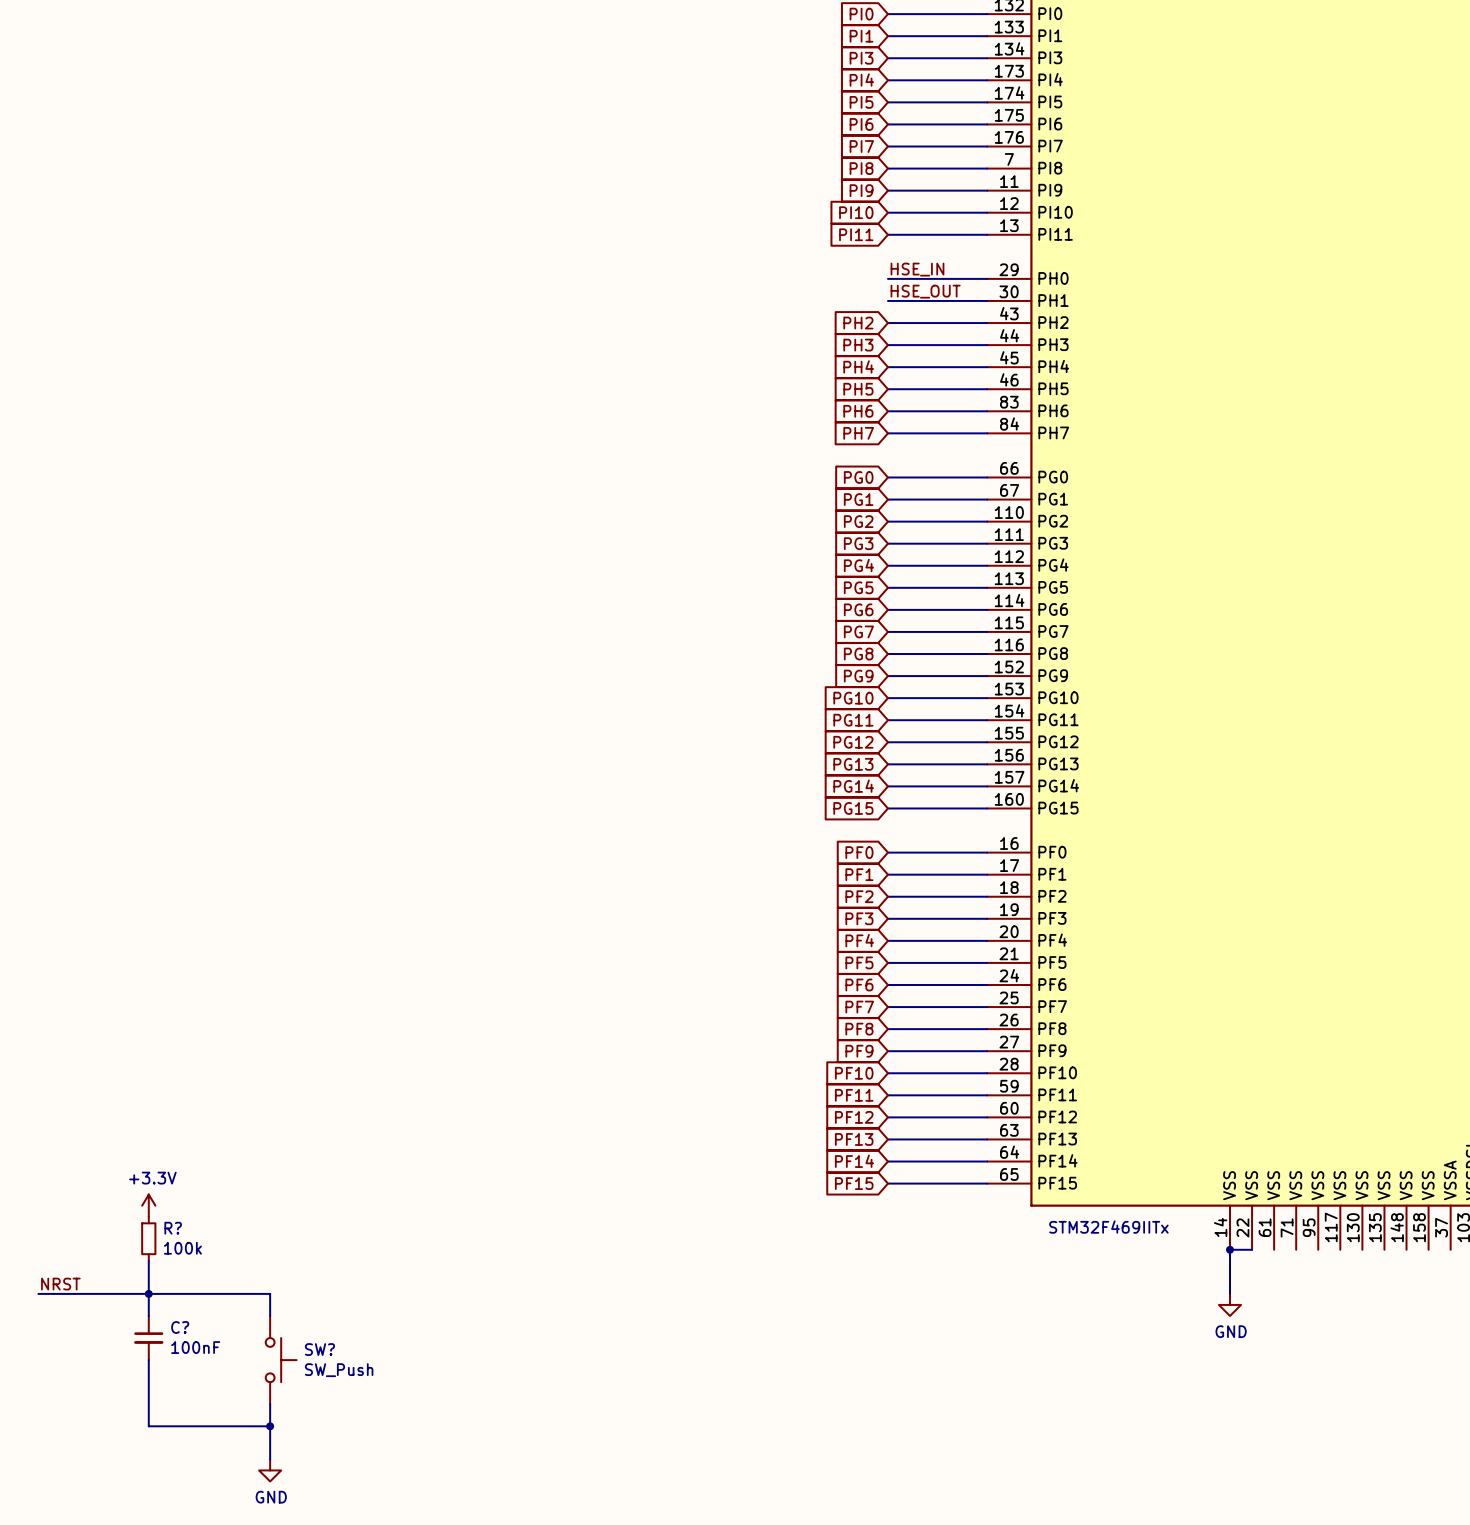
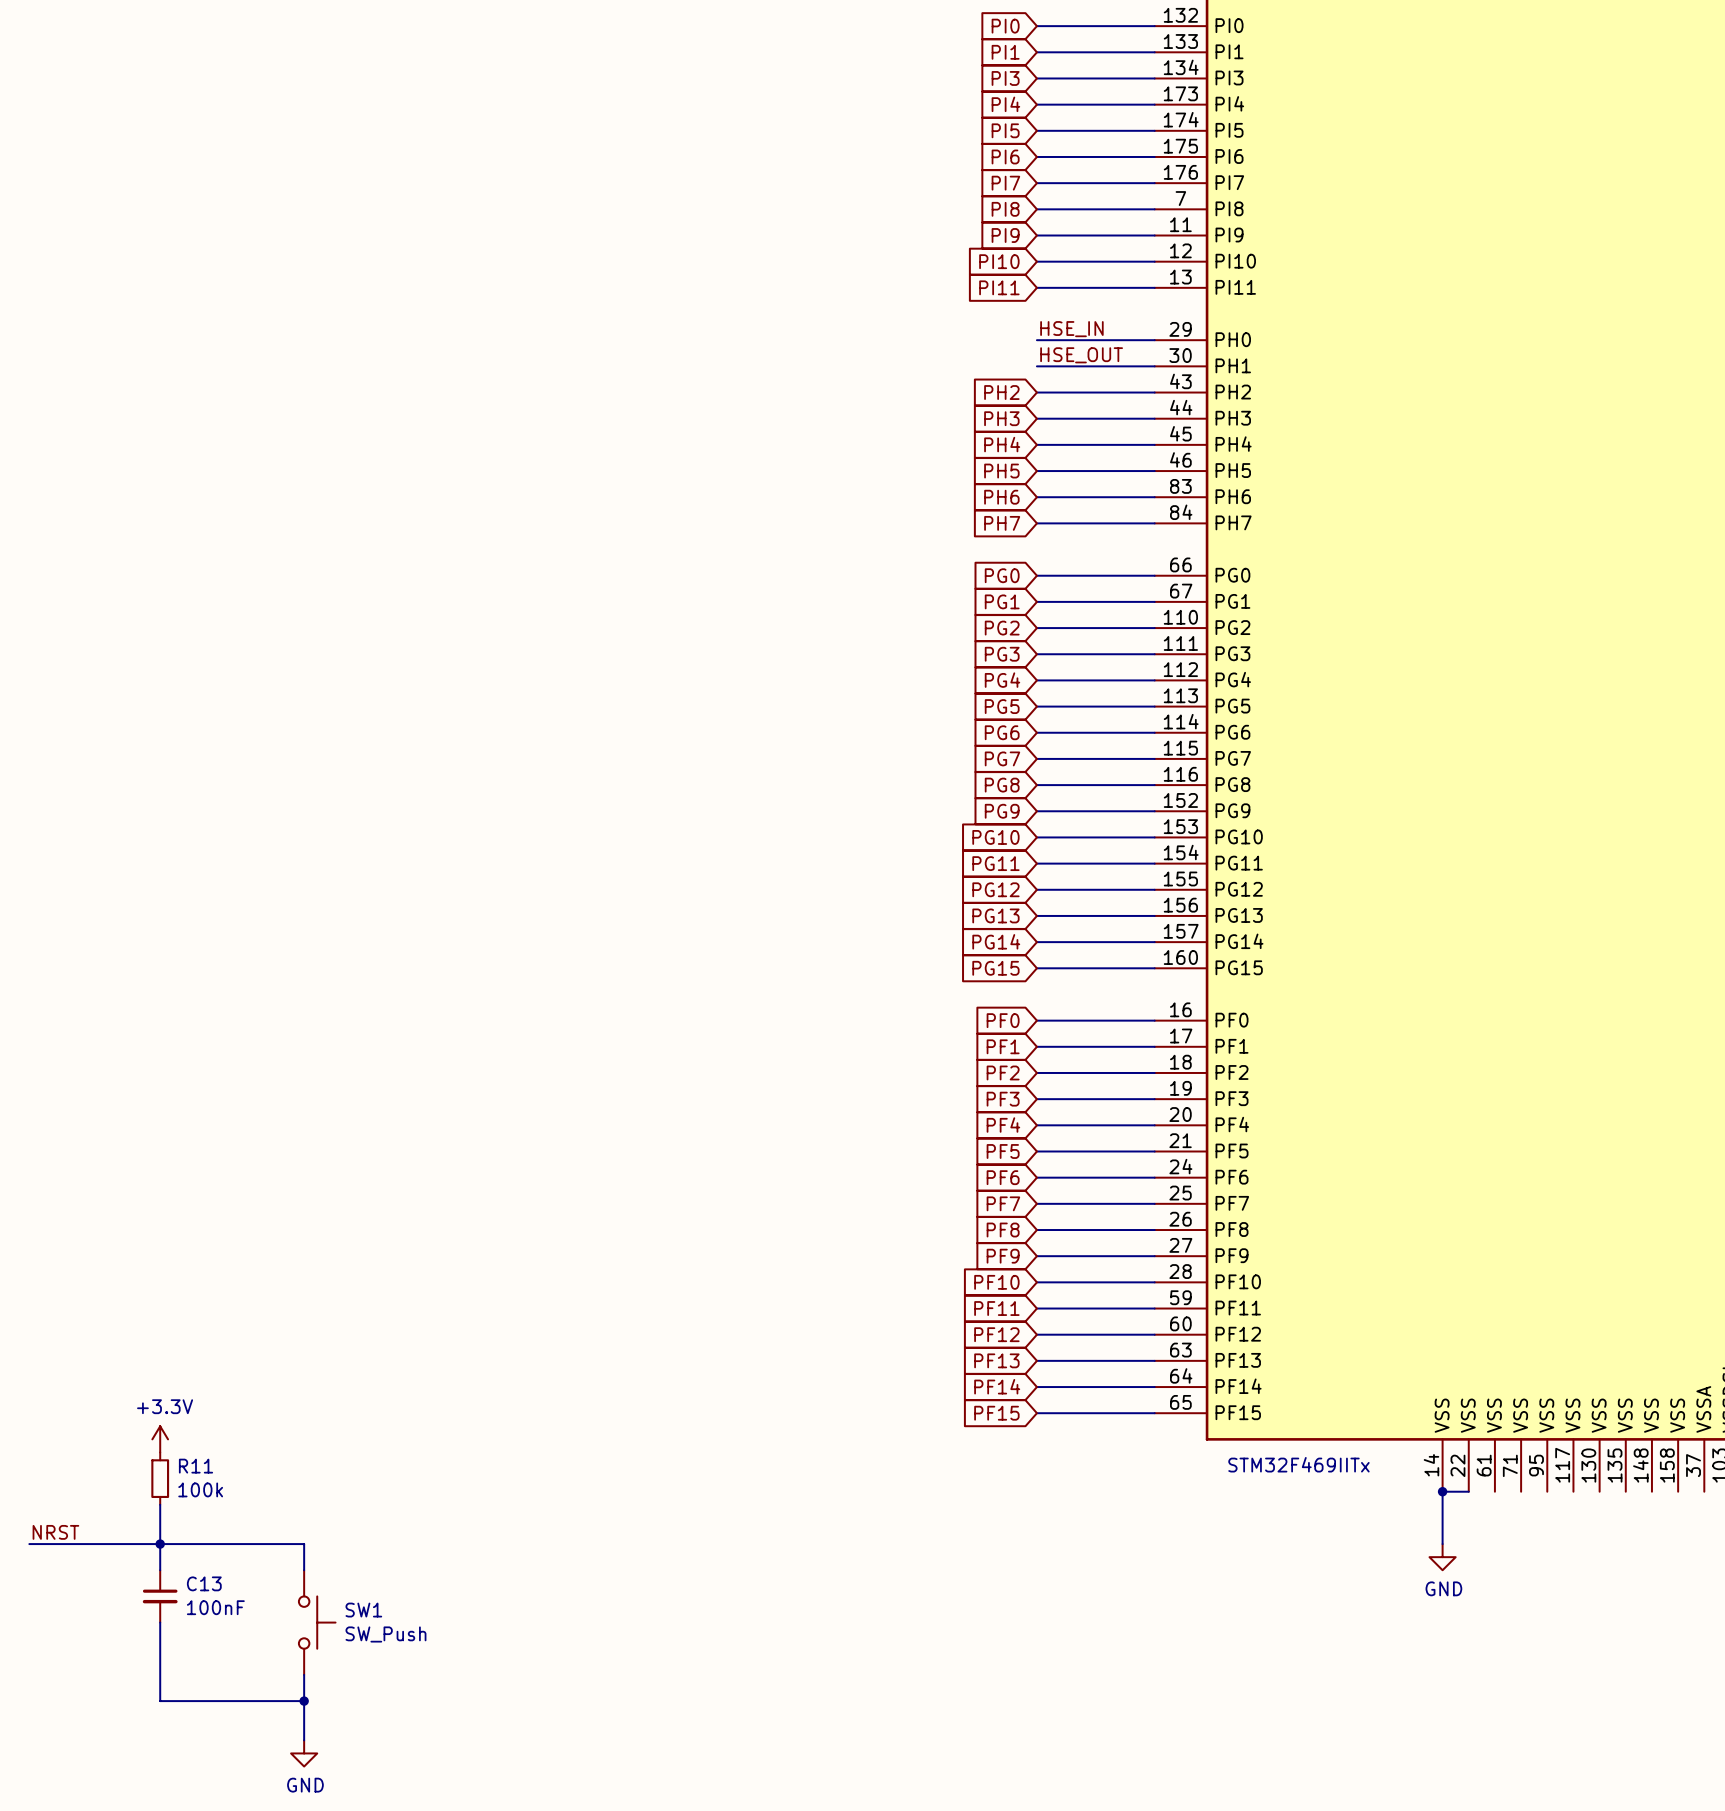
R? name: R? (173, 1228) -> R11 (195, 1466)
C? name: C? (180, 1327) -> C13 (204, 1583)
SW? name: SW? (319, 1349) -> SW1 (363, 1610)

